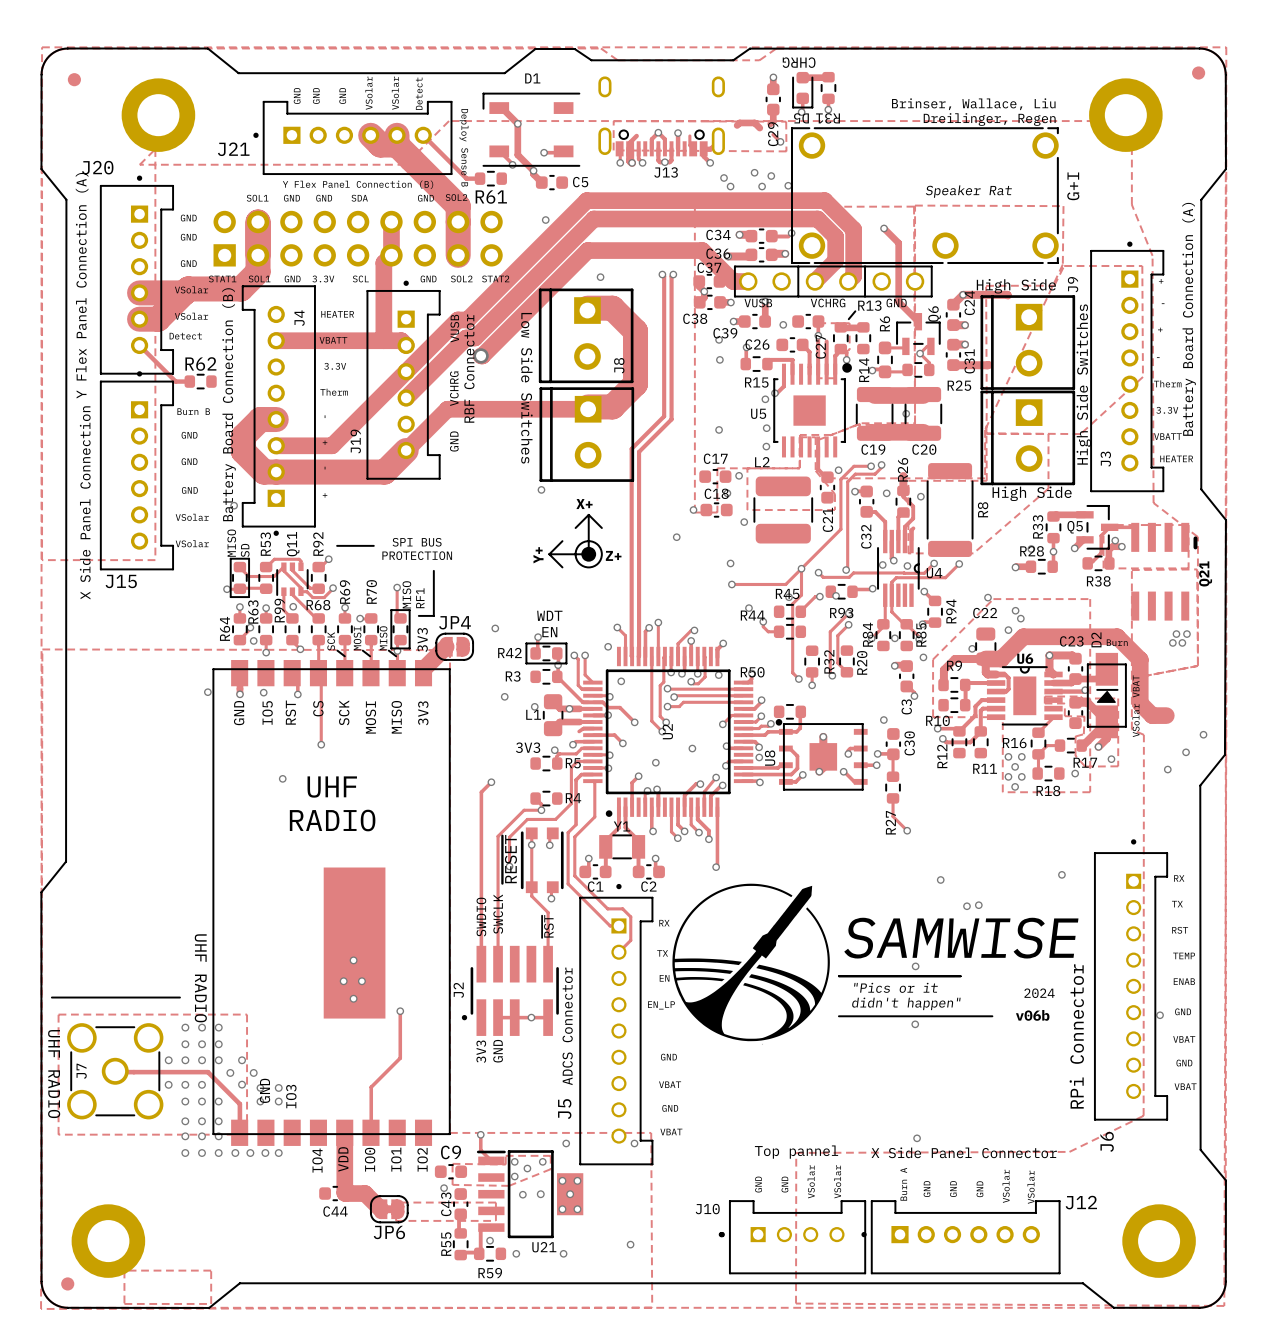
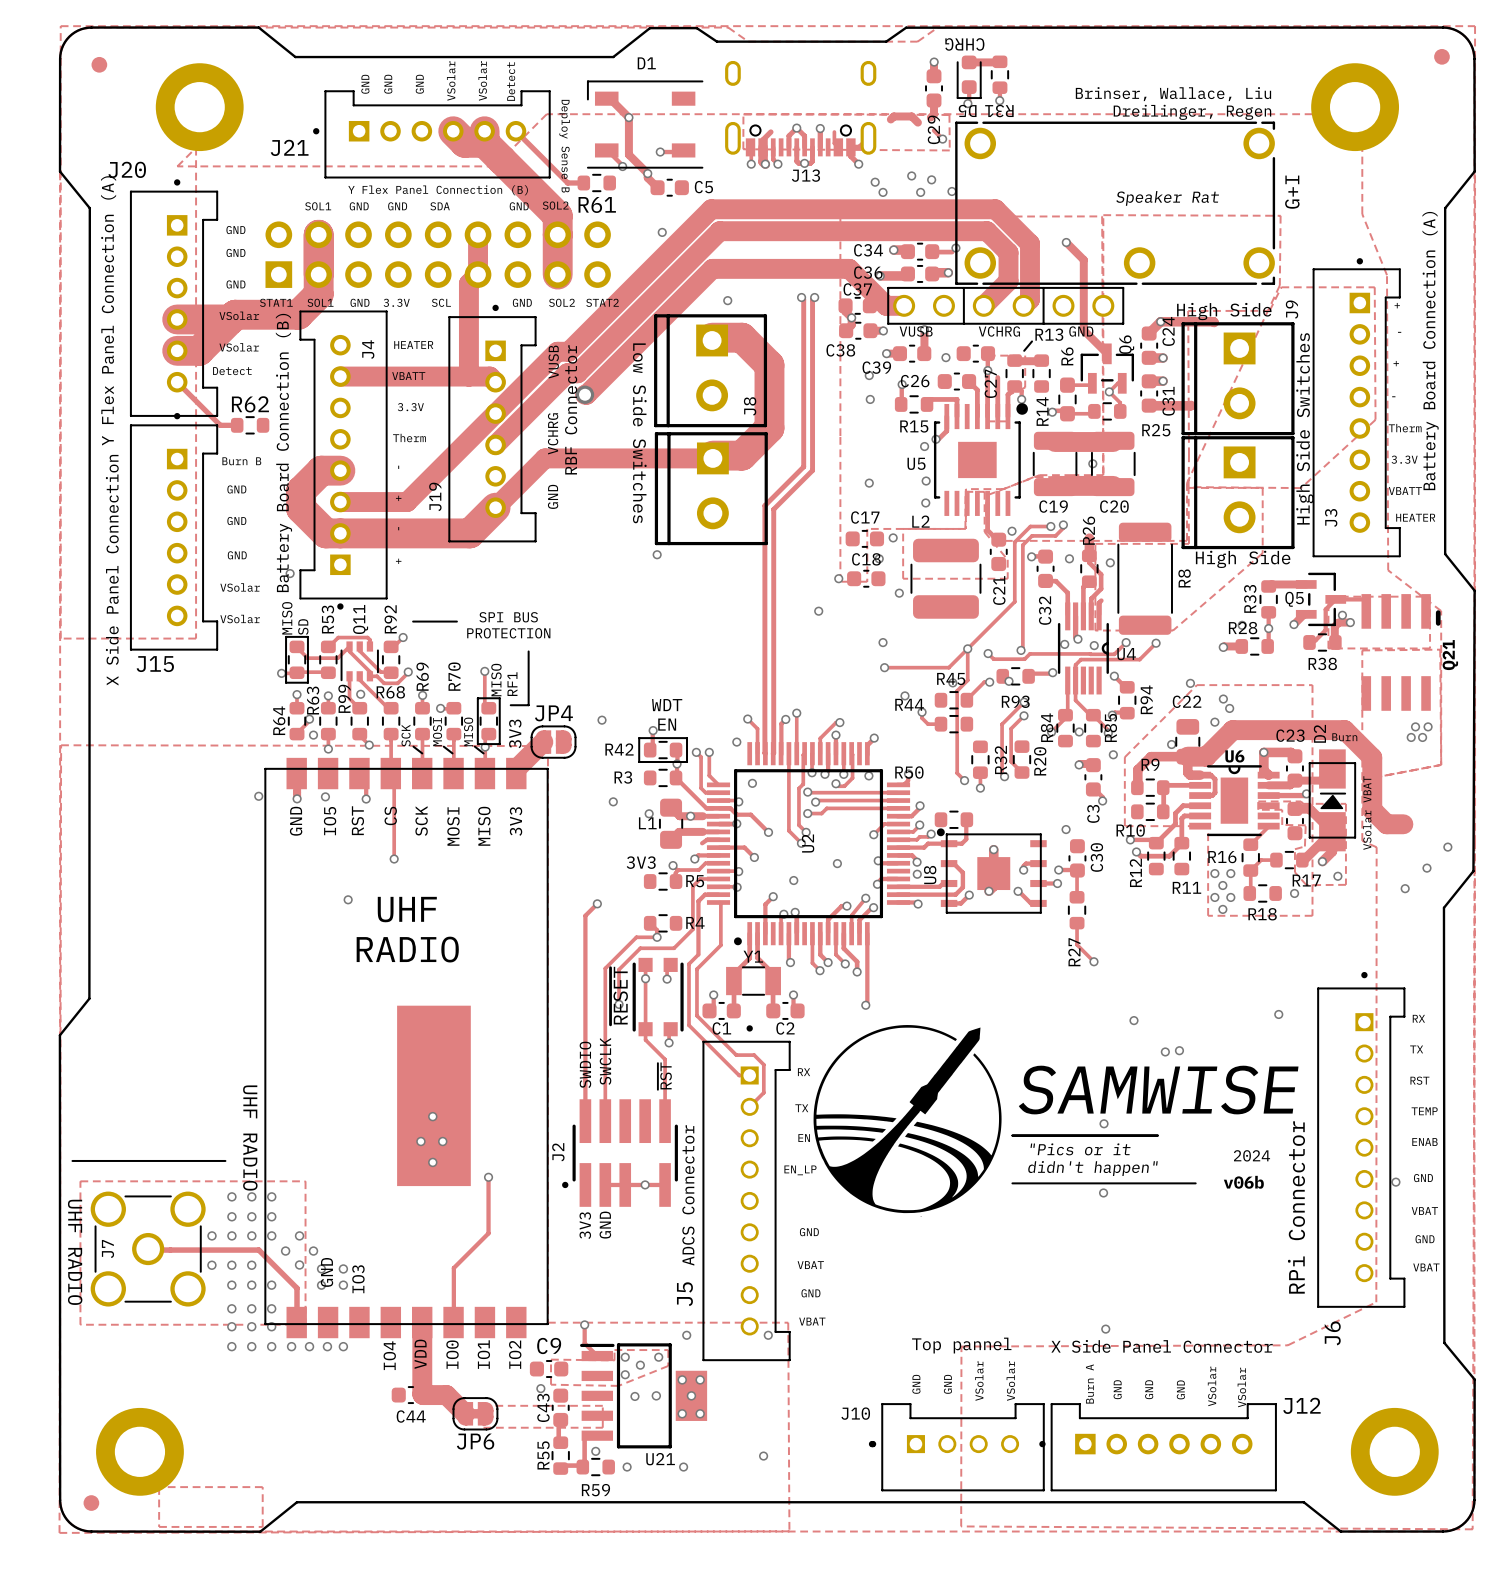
text: X+ (584, 504) -> none
line: (588, 514) (588, 554) (549, 554) -> none
line: (588, 514) (575, 528) -> none
line: (588, 514) (601, 528) -> none
drawing: [574, 540, 603, 569] -> none
line: (562, 541) (549, 554) -> none
line: (549, 554) (562, 567) -> none
text: Y+ (538, 555) -> none
text: Z+ (613, 555) -> none

